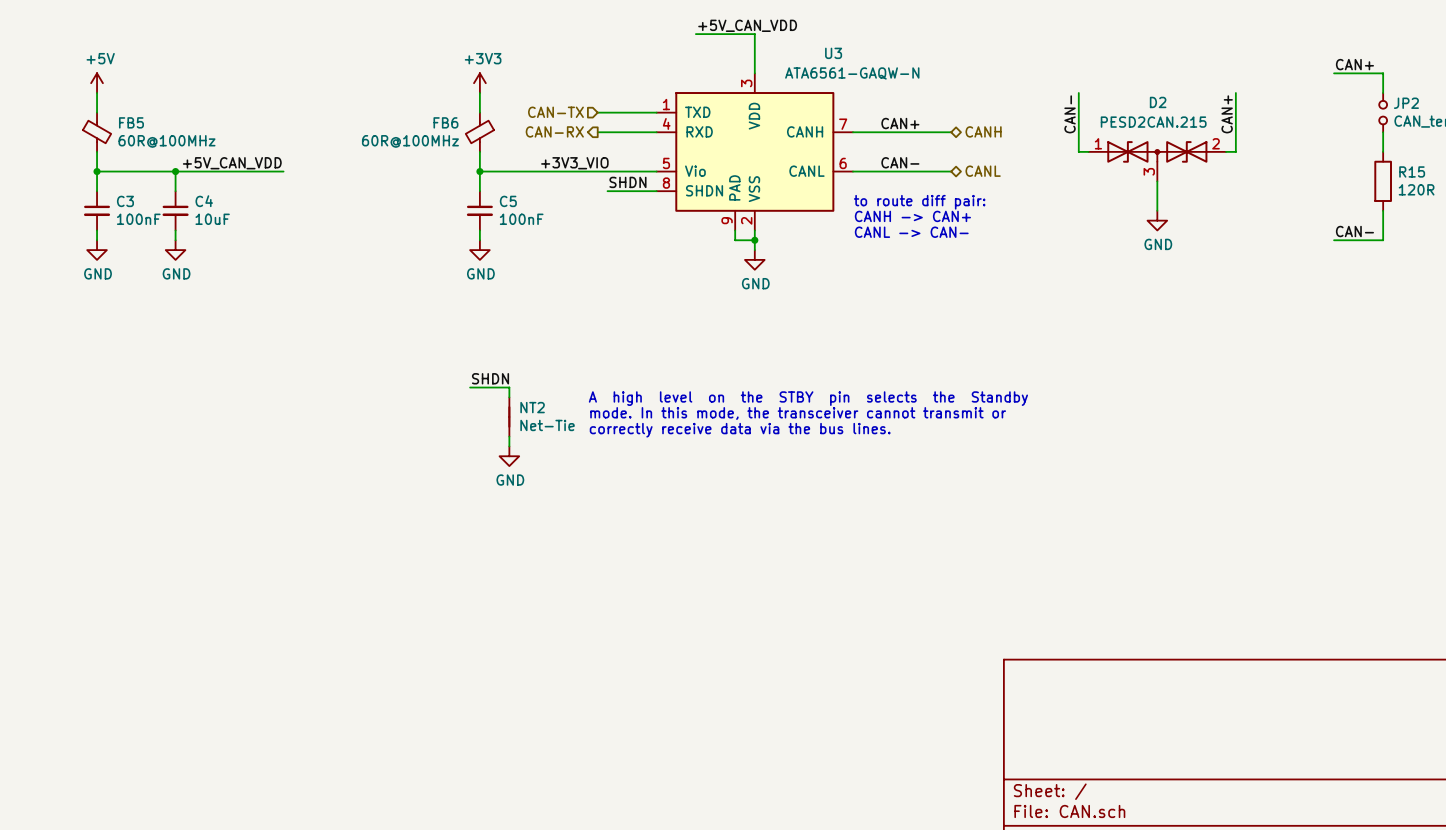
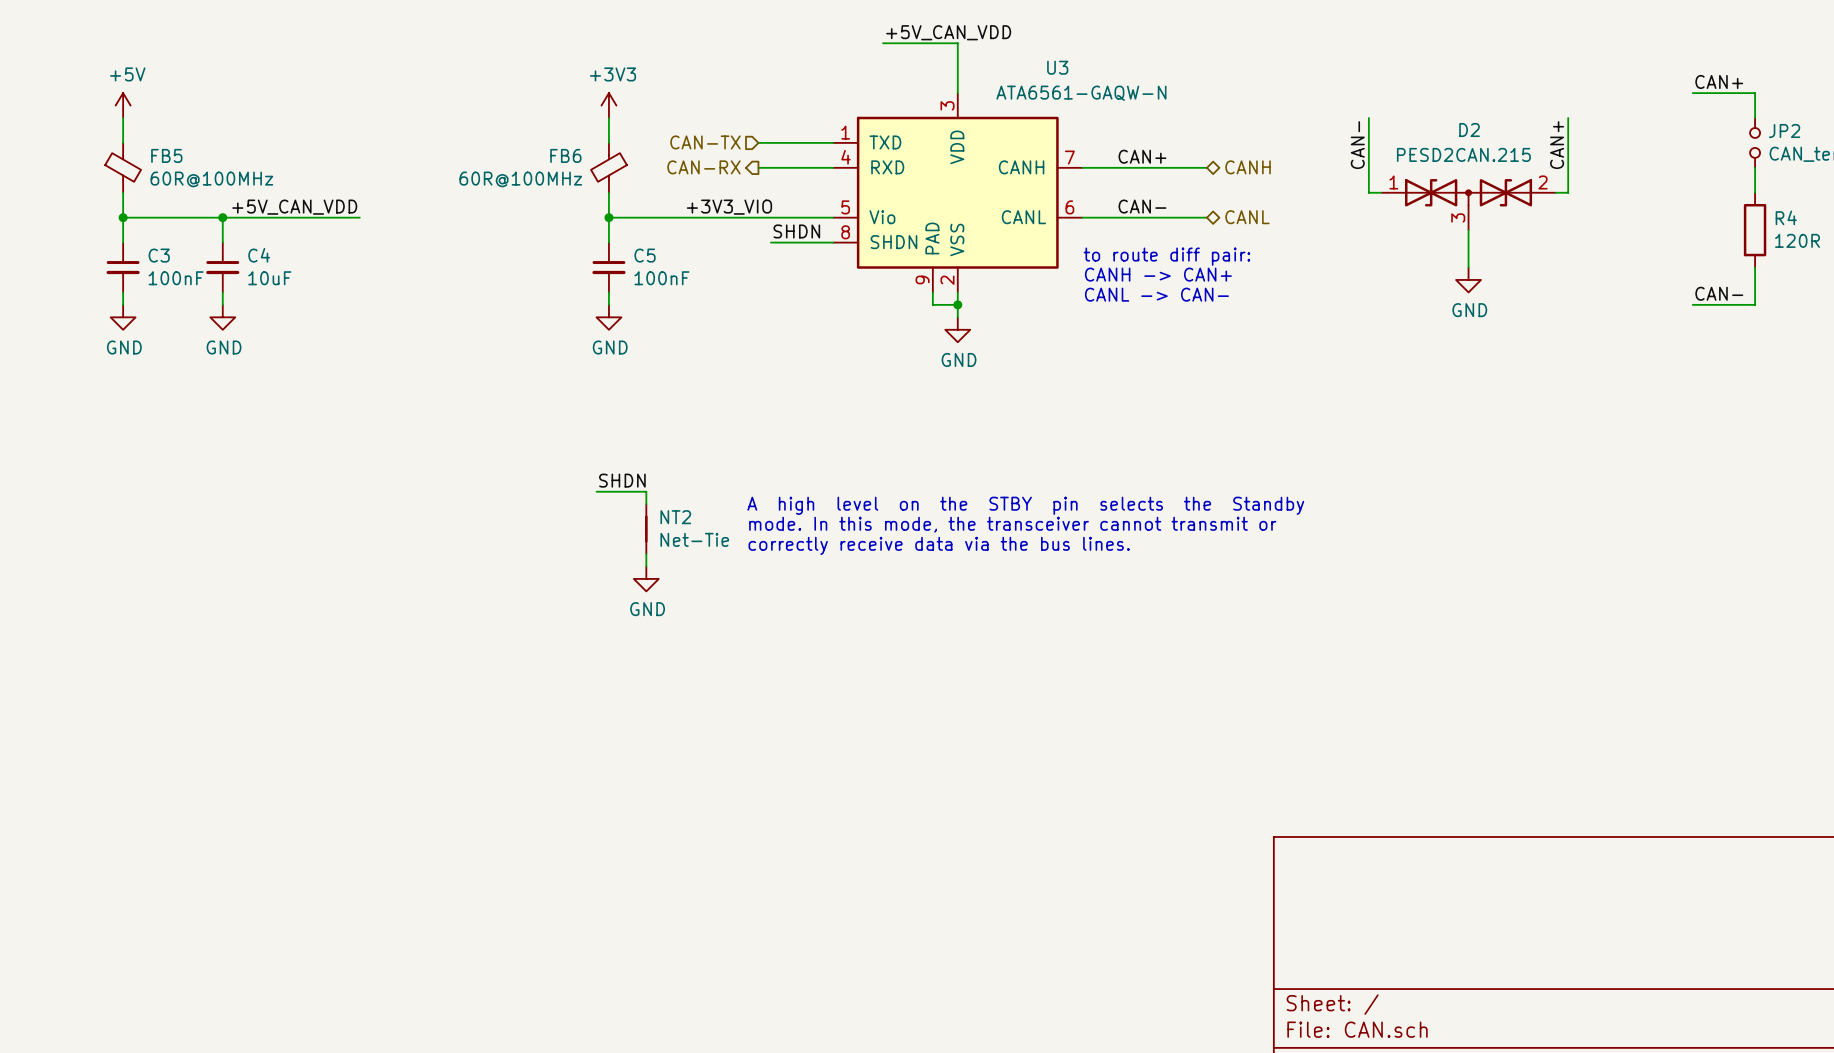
R15 name: R15 (1412, 171) -> R4 (1786, 217)

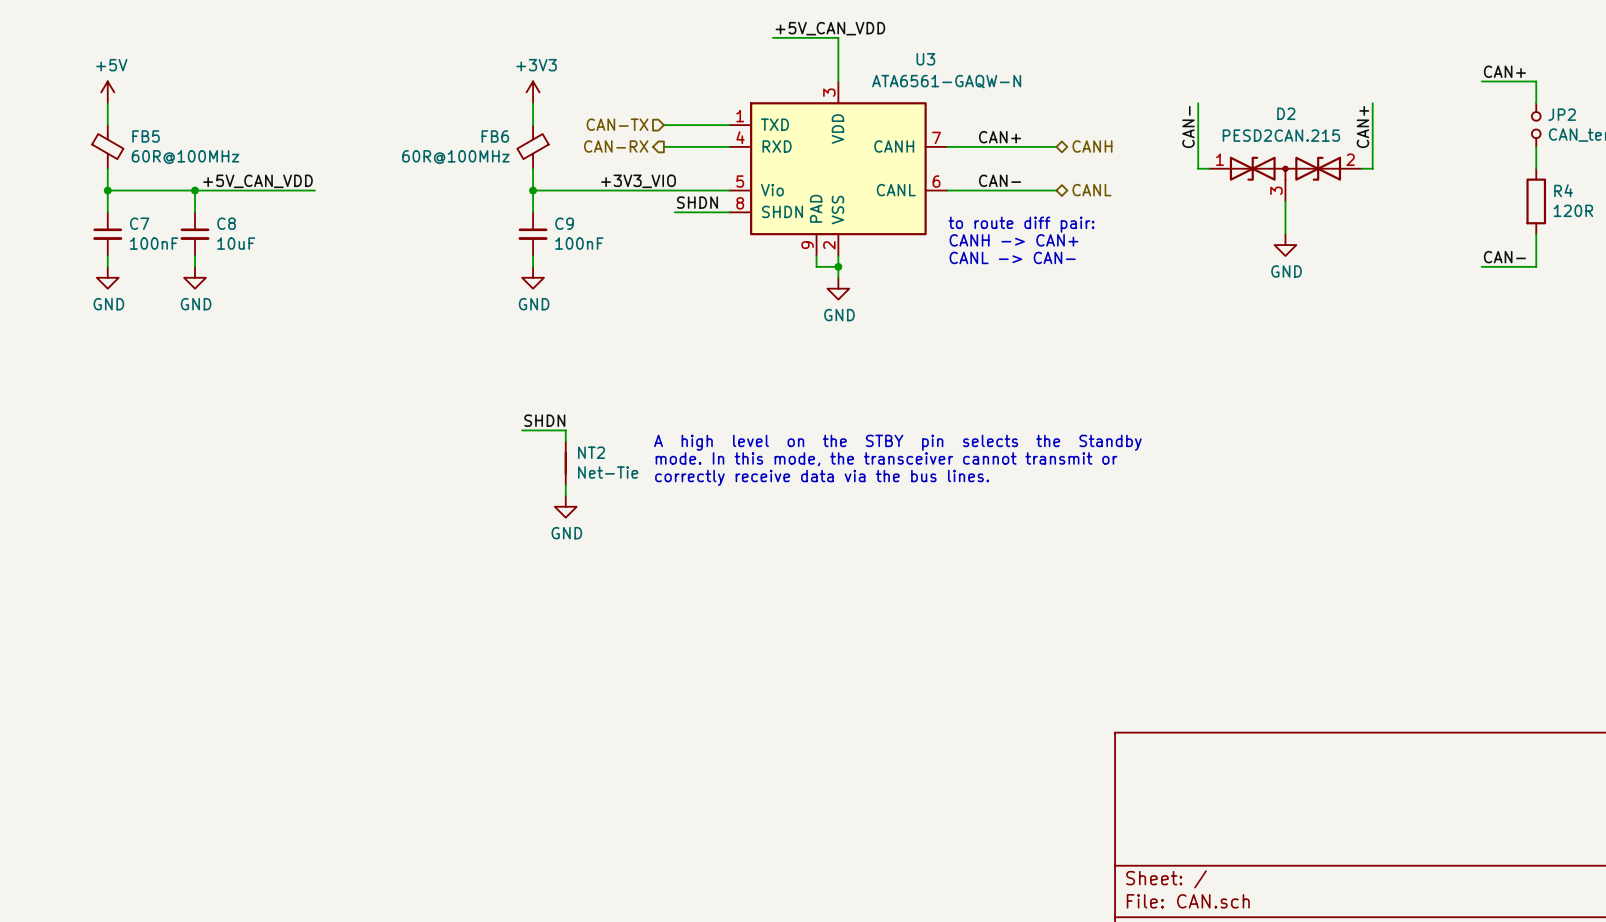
C3 name: C3 (159, 255) -> C7 (139, 223)
C4 name: C4 (259, 255) -> C8 (226, 223)
C5 name: C5 (645, 255) -> C9 (564, 223)

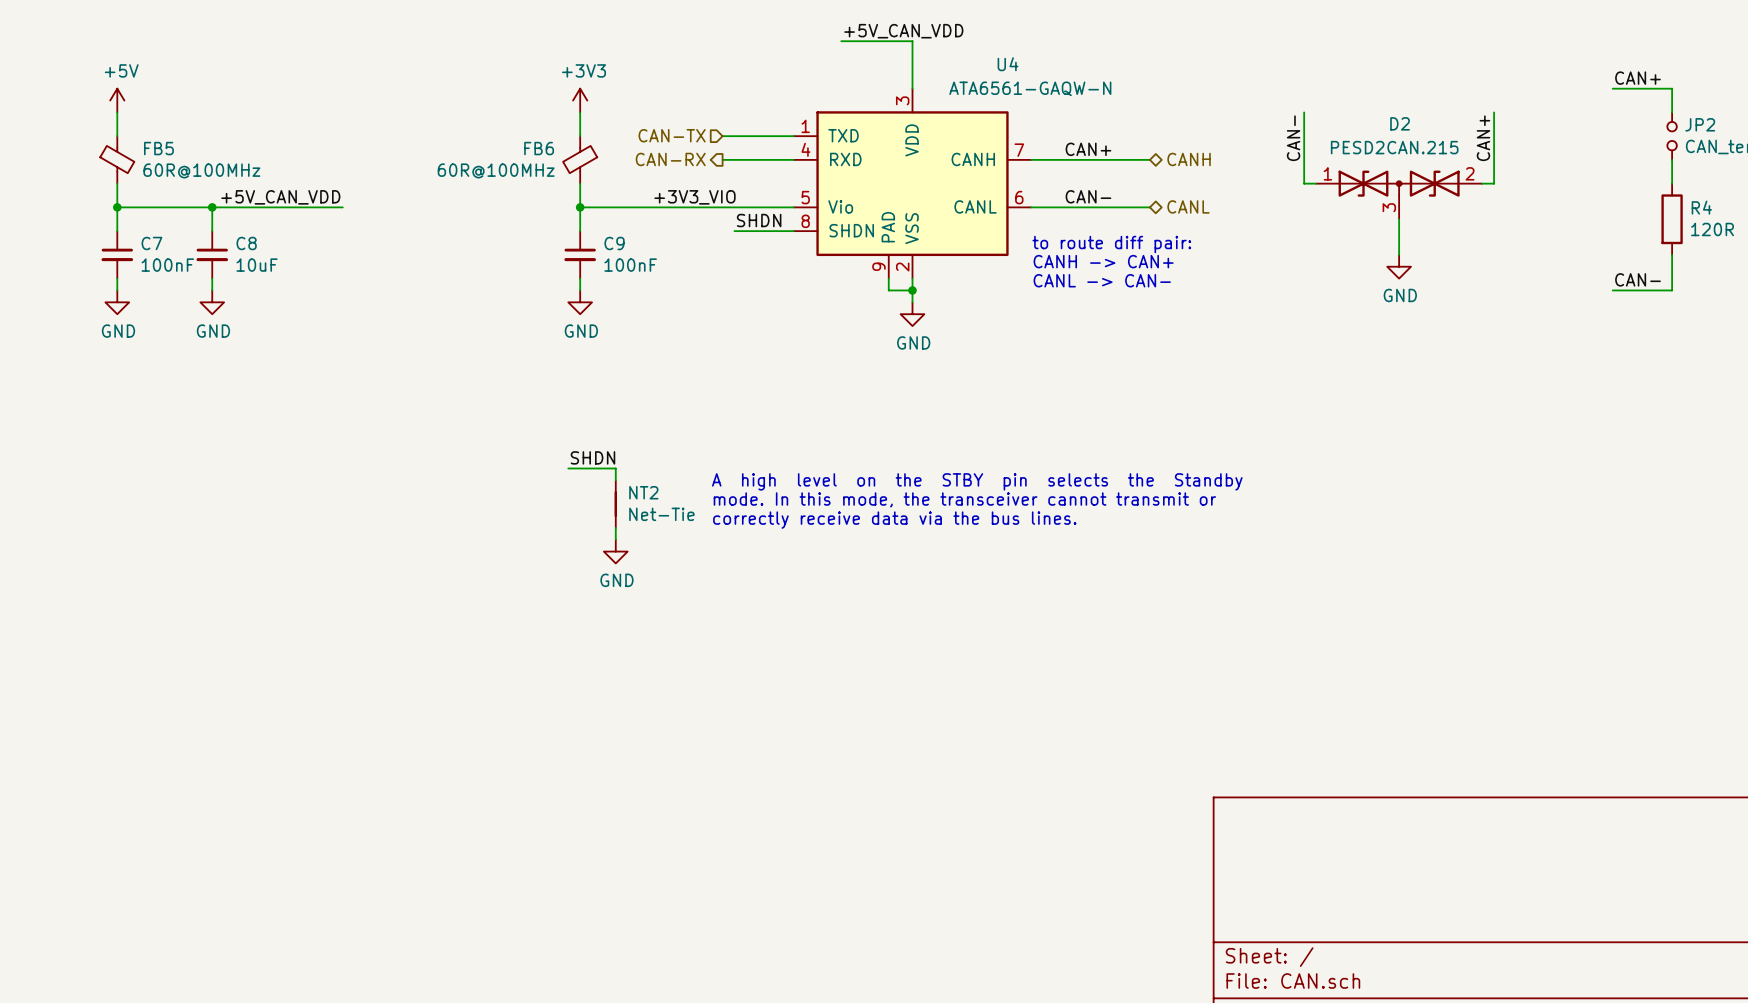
U3 name: U3 (925, 59) -> U4 (1008, 64)

